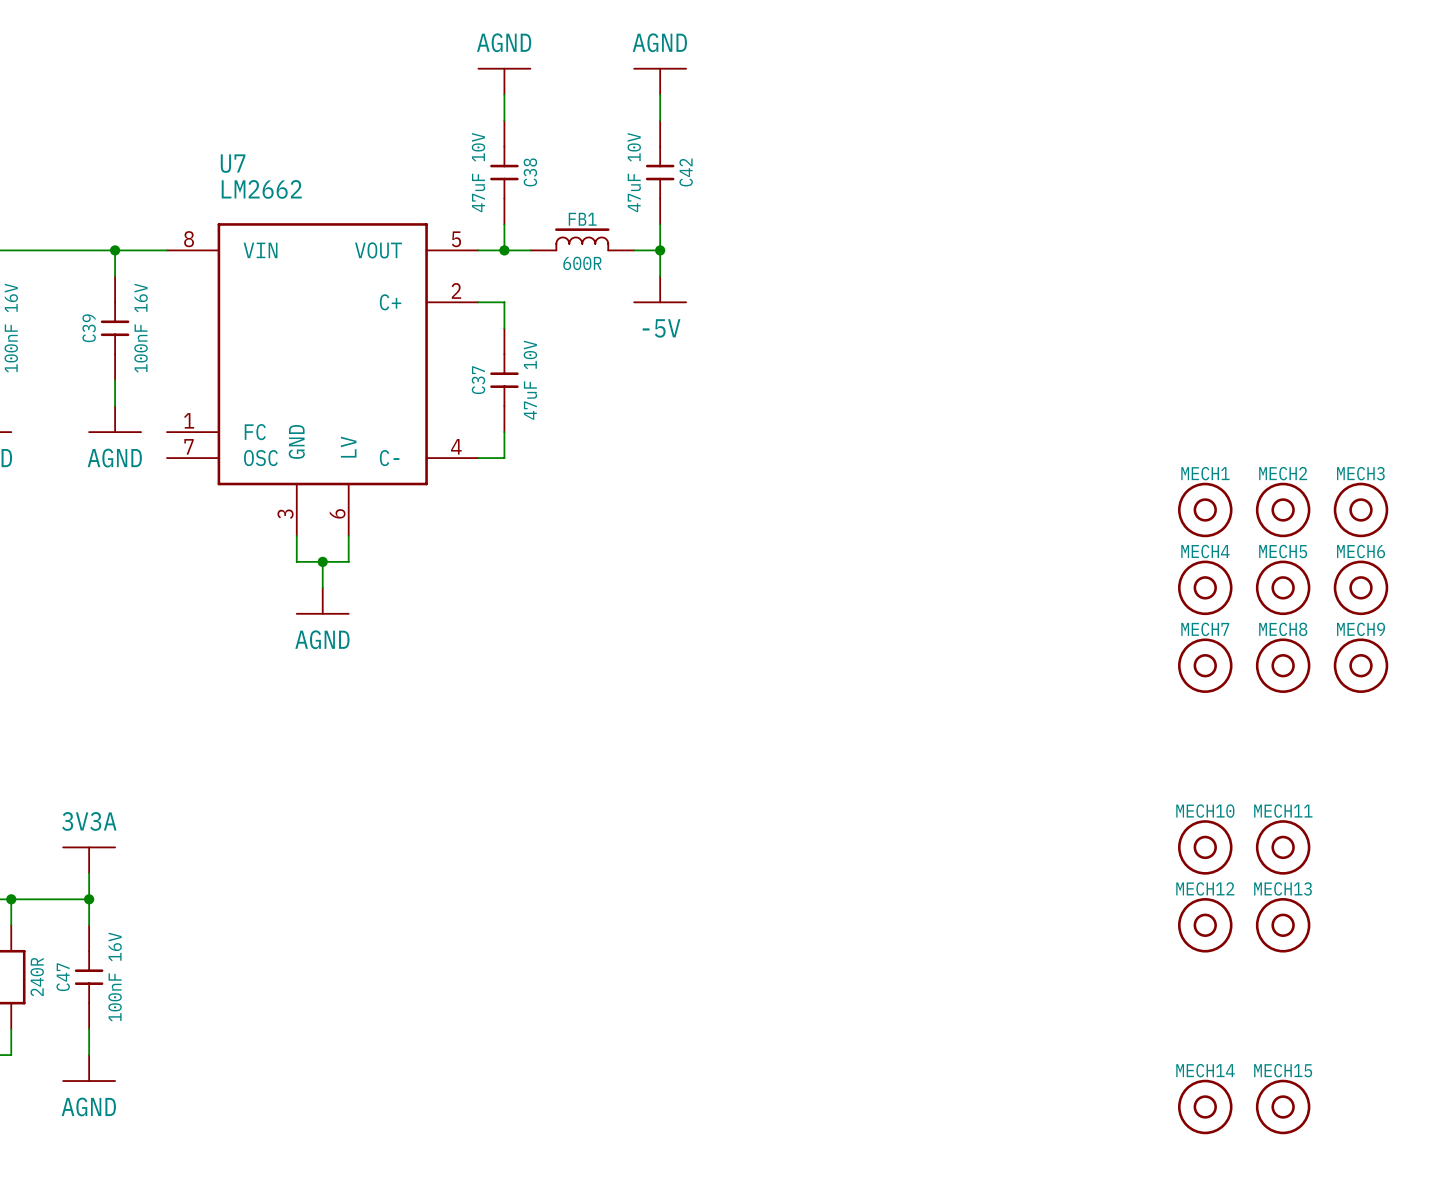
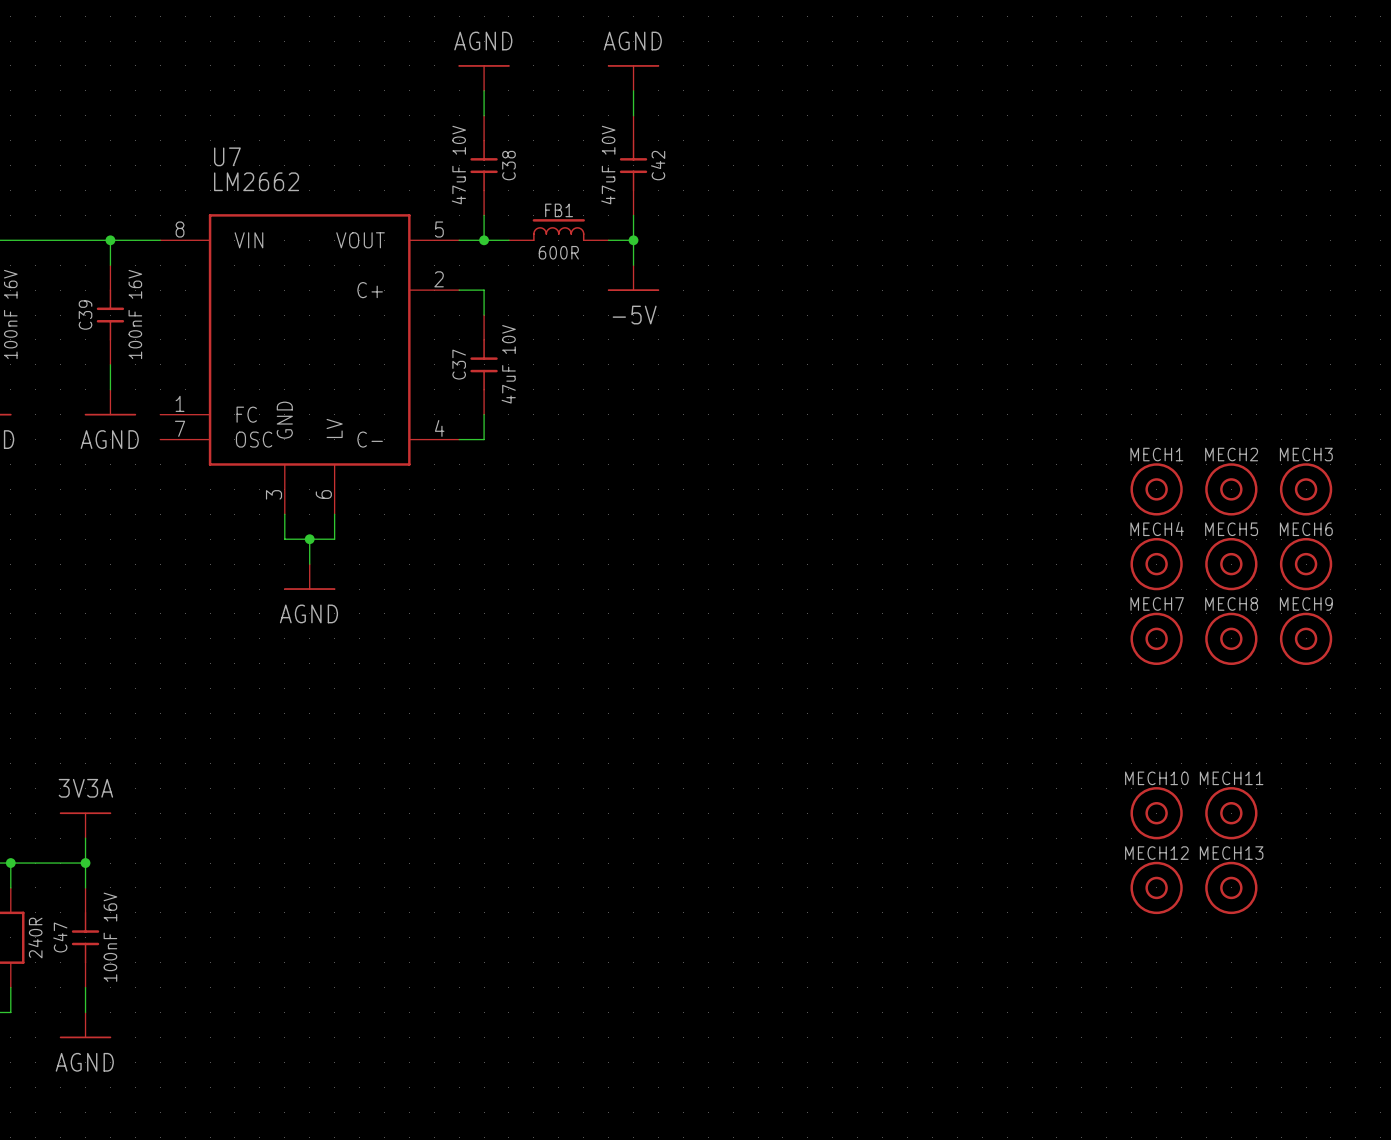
MECH14: (1205, 1106) -> none
MECH15: (1283, 1106) -> none

